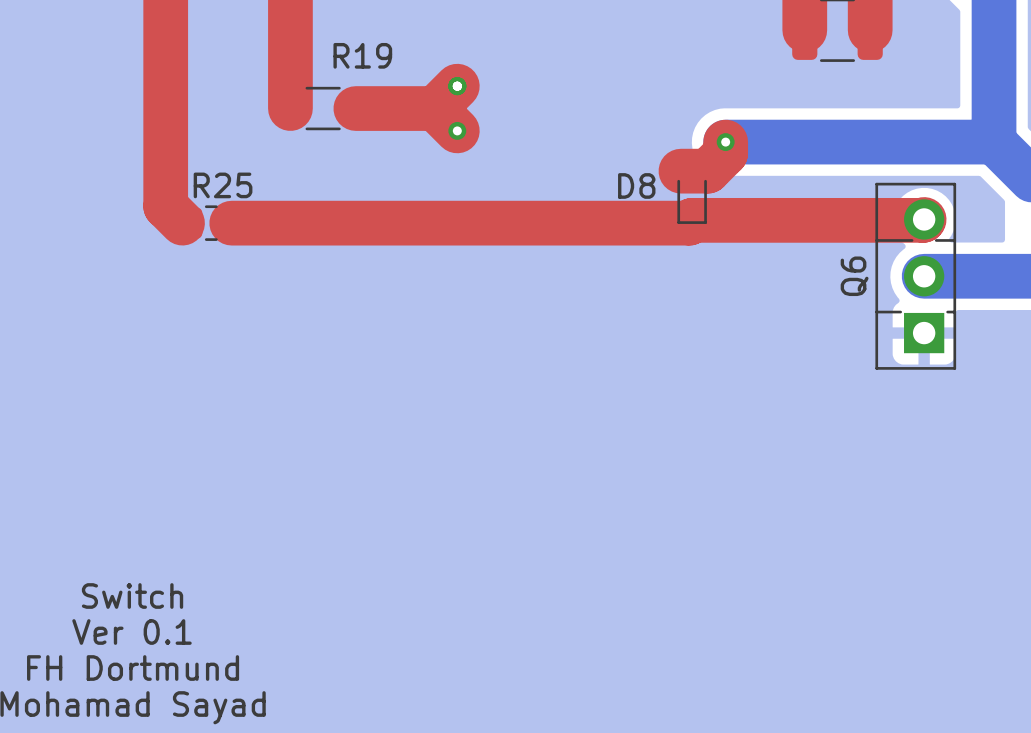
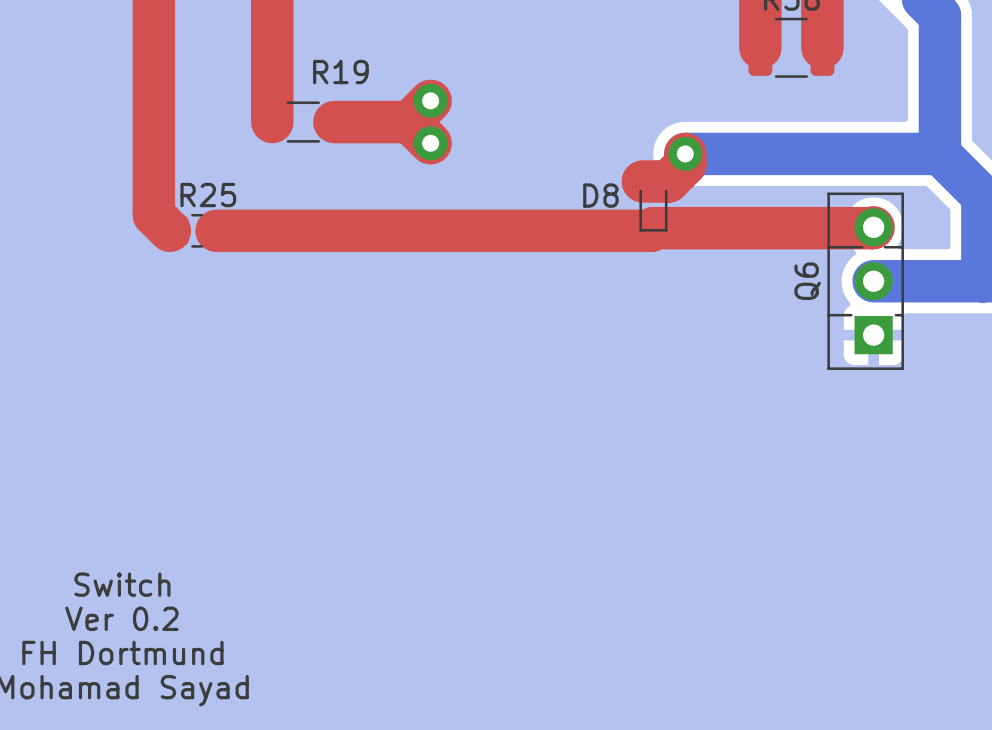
via: none -> (430, 100)
via size: [448, 121, 467, 140] -> [413, 126, 448, 161]
via size: [716, 133, 735, 152] -> [668, 136, 703, 171]
text: Ver 0.1 (131, 632) -> Ver 0.2 (121, 618)

